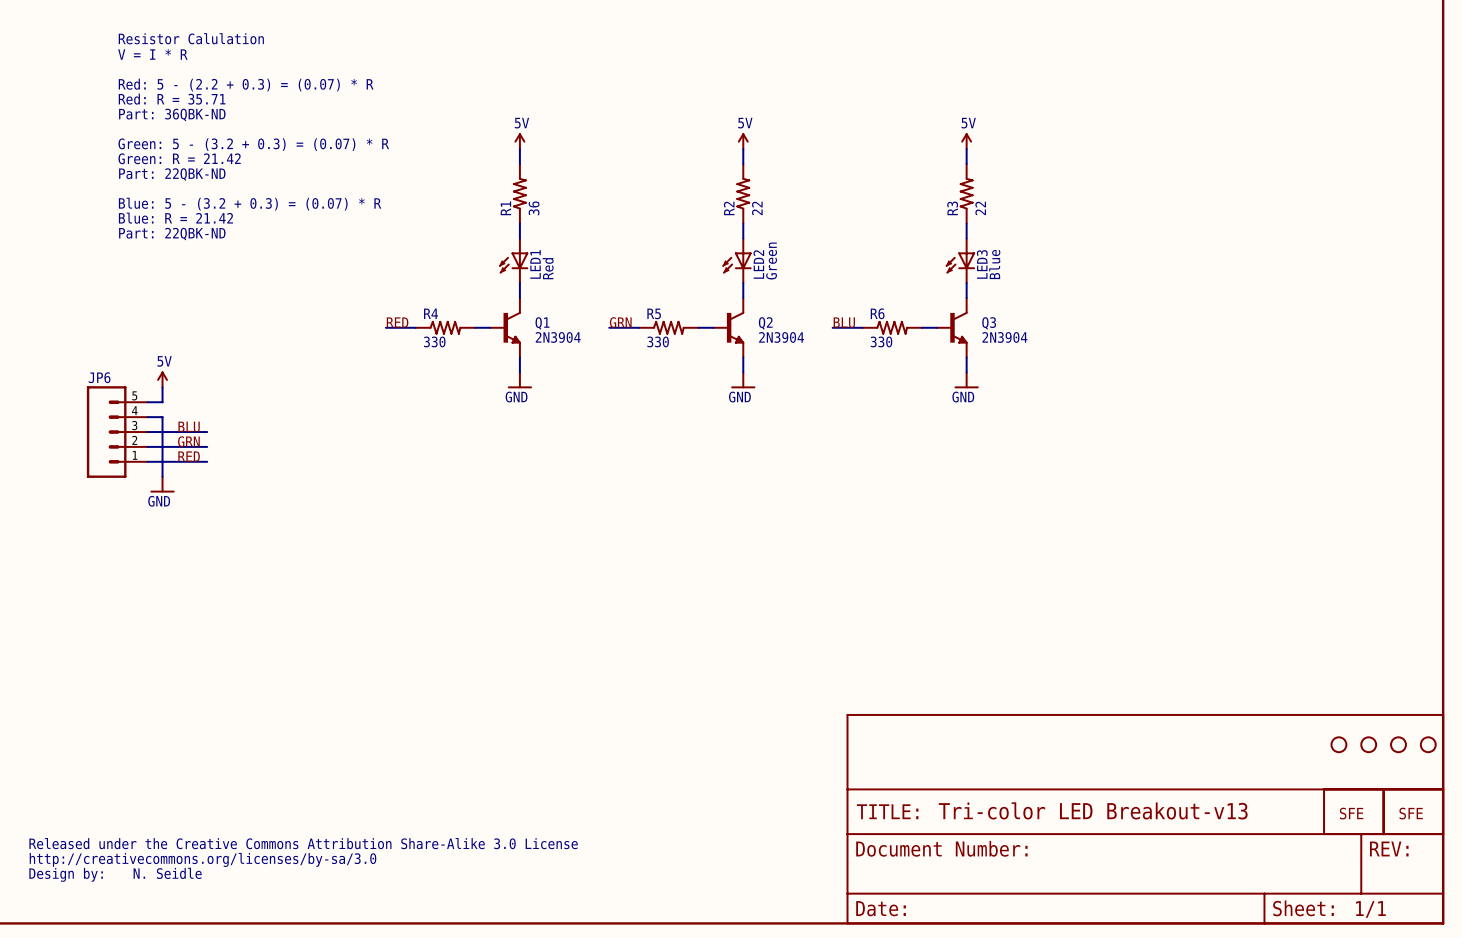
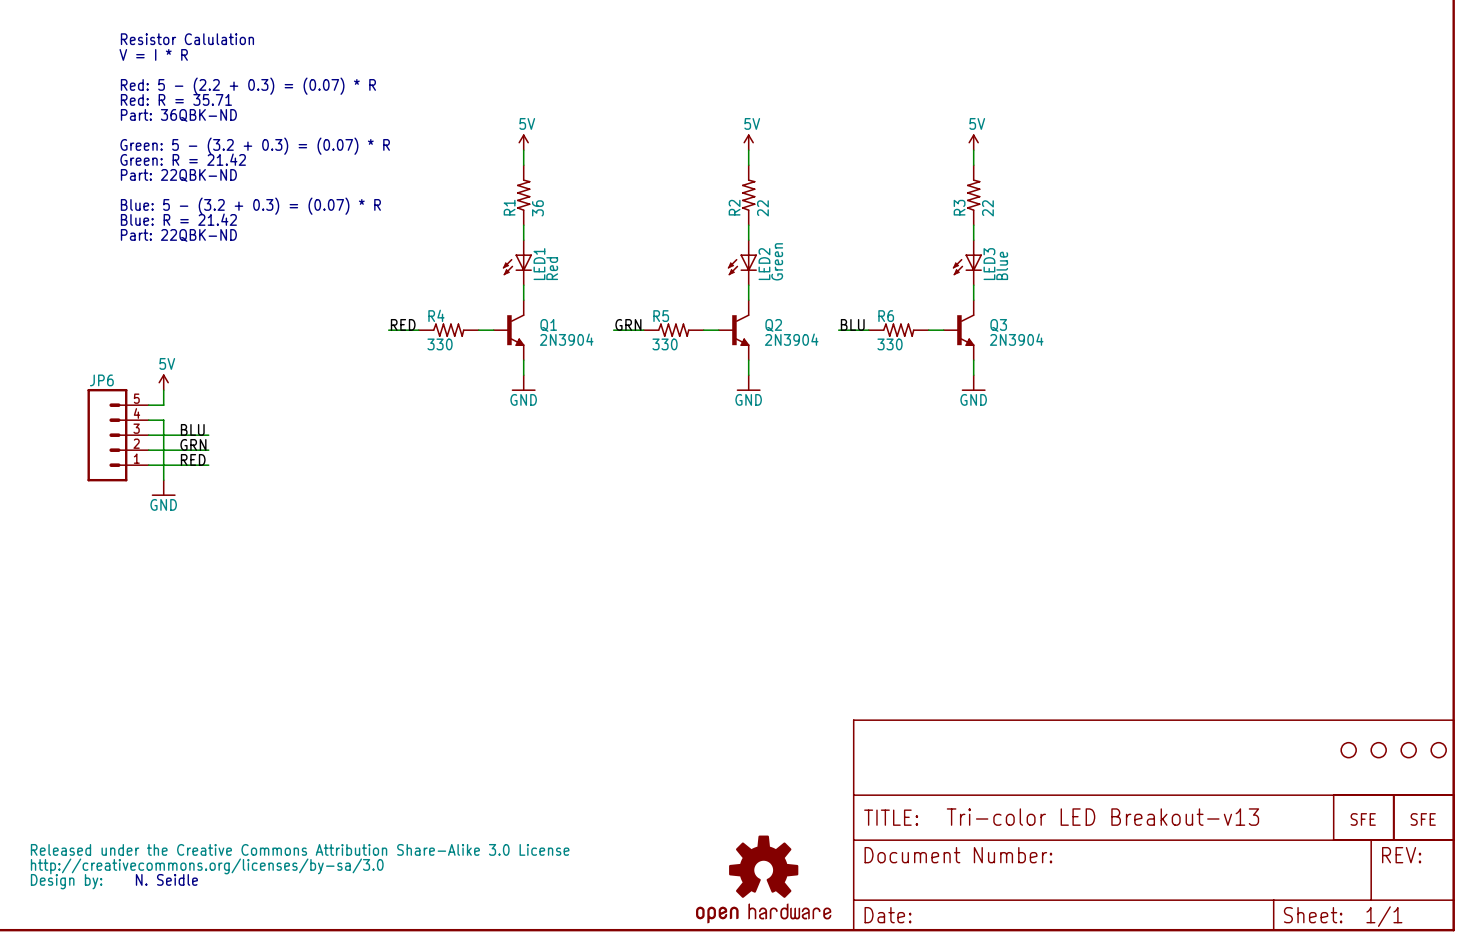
part: none -> (763, 879)

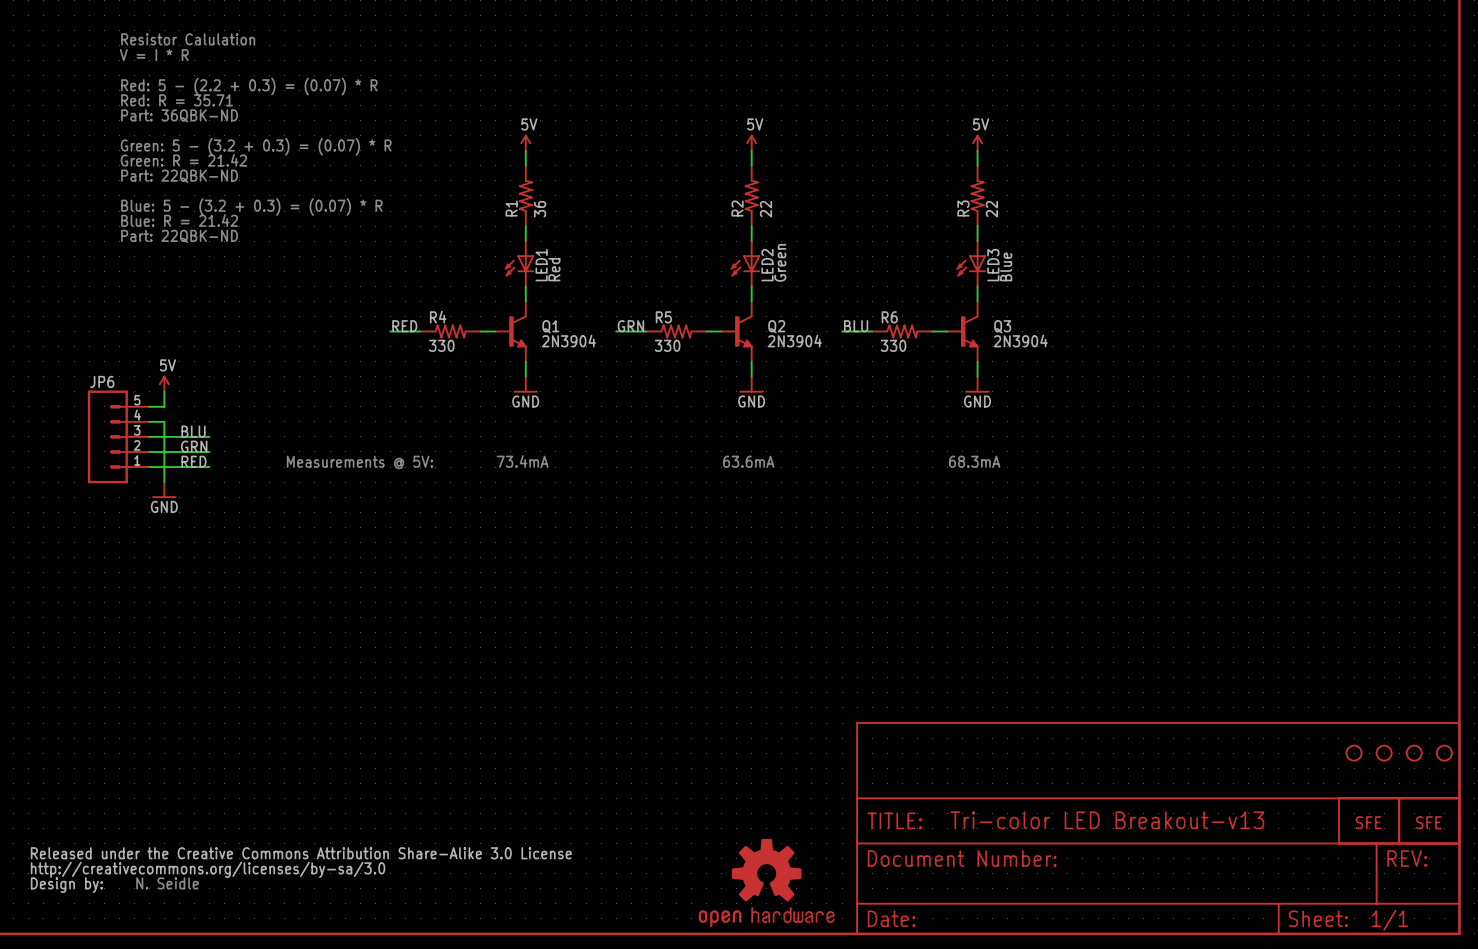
text: none -> 73.4mA (522, 461)
text: none -> 63.6mA (748, 461)
text: none -> 68.3mA (974, 461)
text: none -> Measurements @ 5V: (359, 462)

